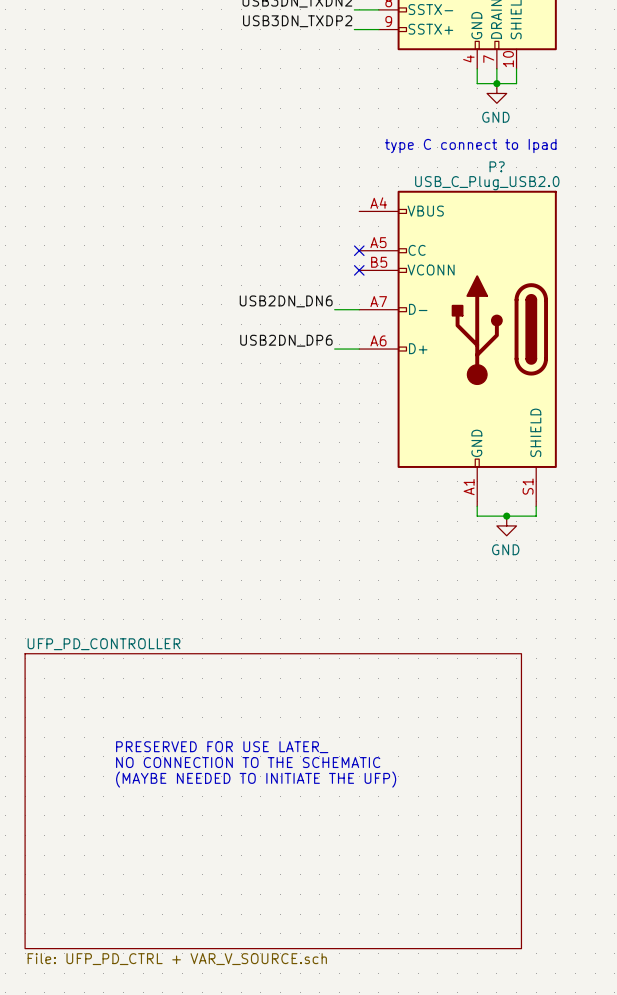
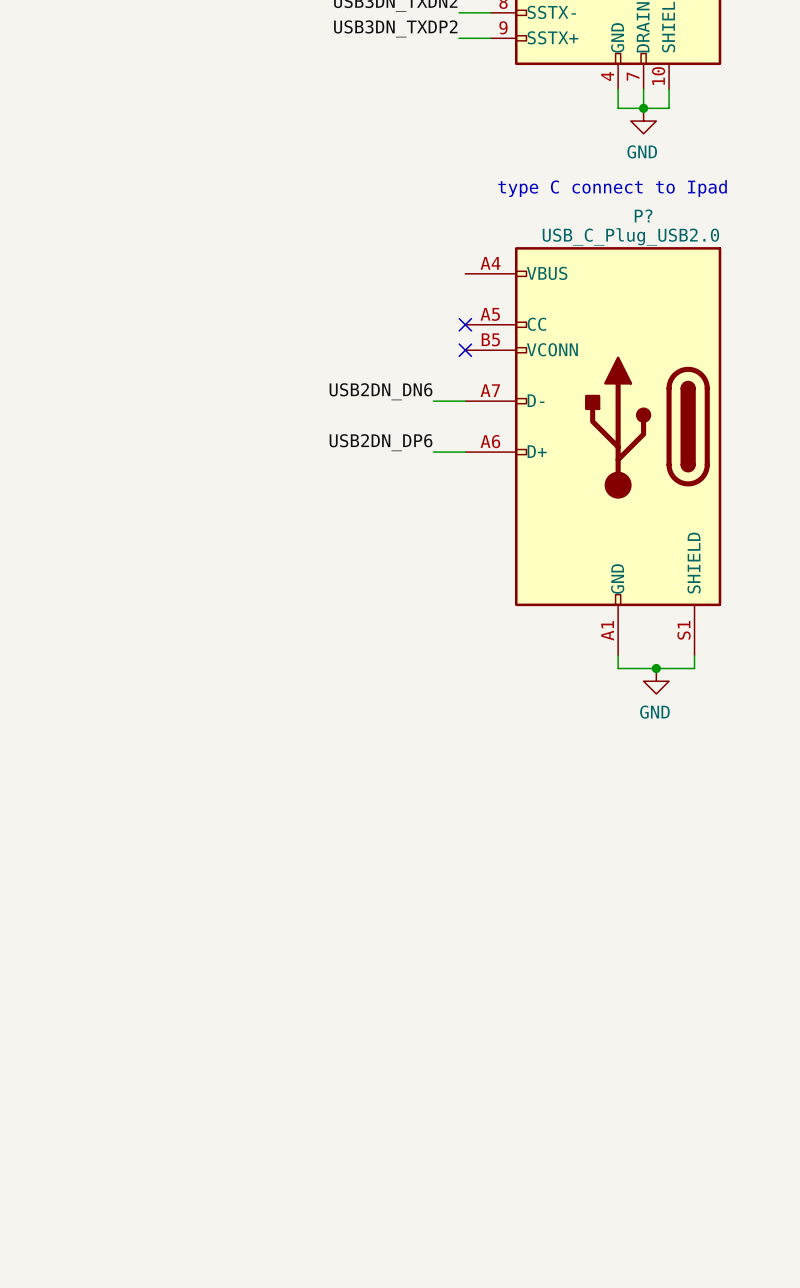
text: PRESERVED FOR USE LATER_ (222, 747) -> none
text: NO CONNECTION TO THE SCHEMATIC (248, 762) -> none
text: (MAYBE NEEDED TO INITIATE THE UFP) (256, 779) -> none
sheet UFP_PD_CONTROLLER: File: UFP_PD_CTRL + VAR_V_SOURCE.sch (273, 801) -> none

